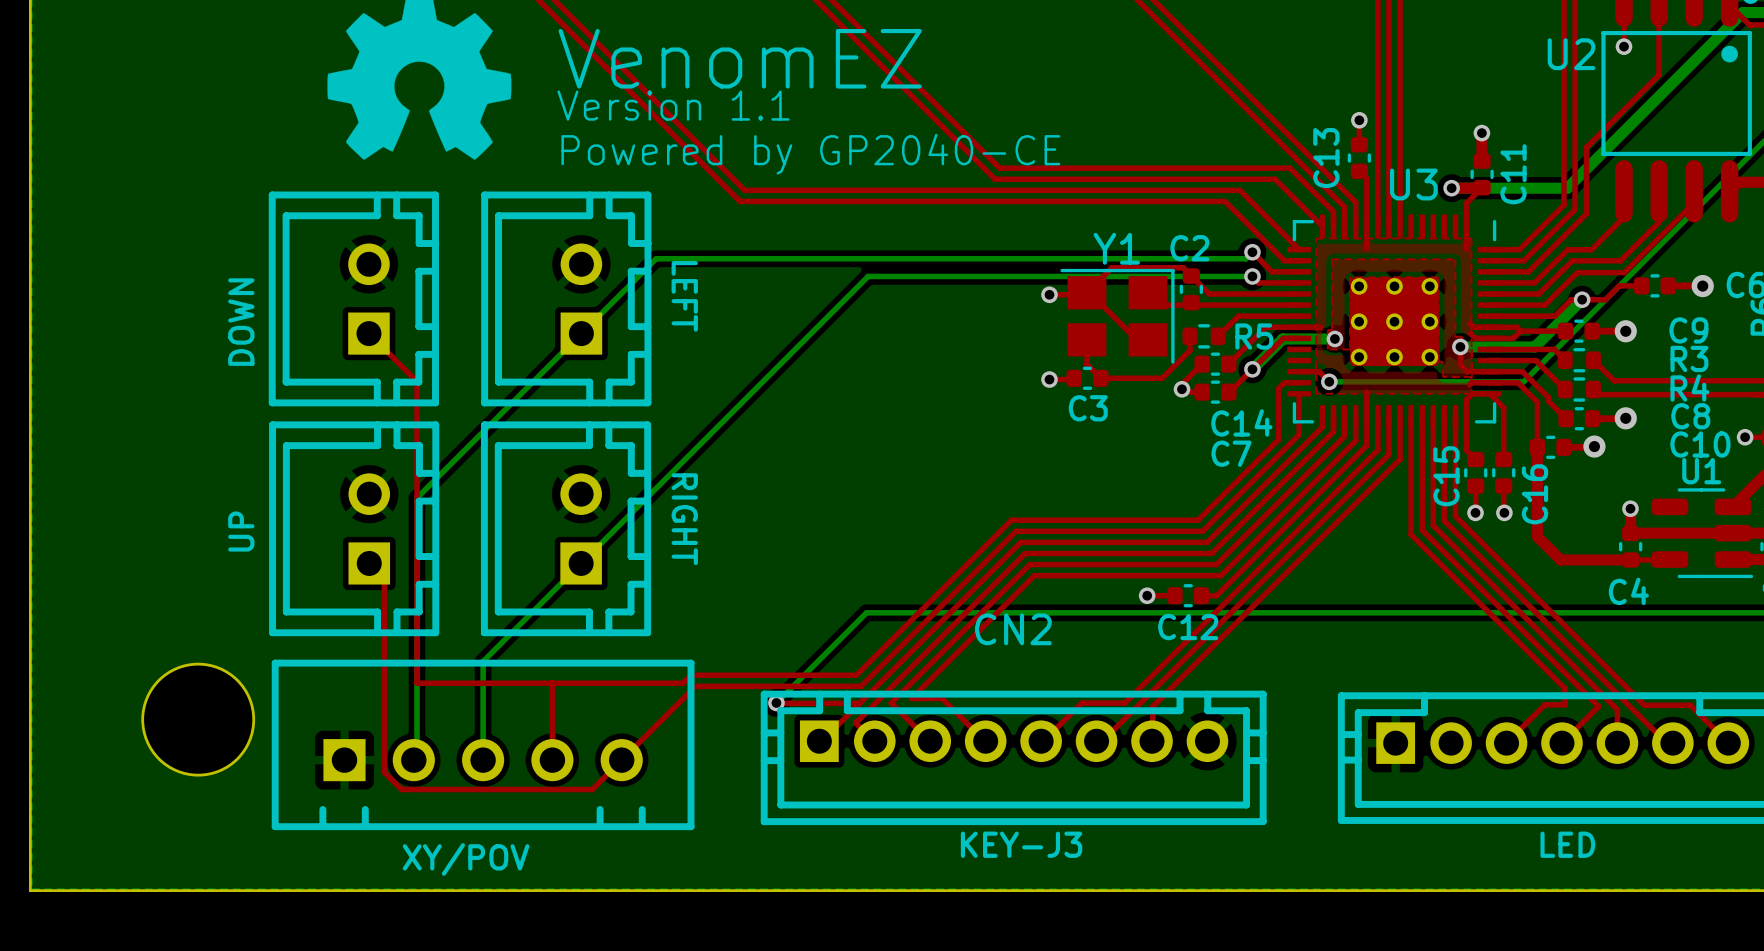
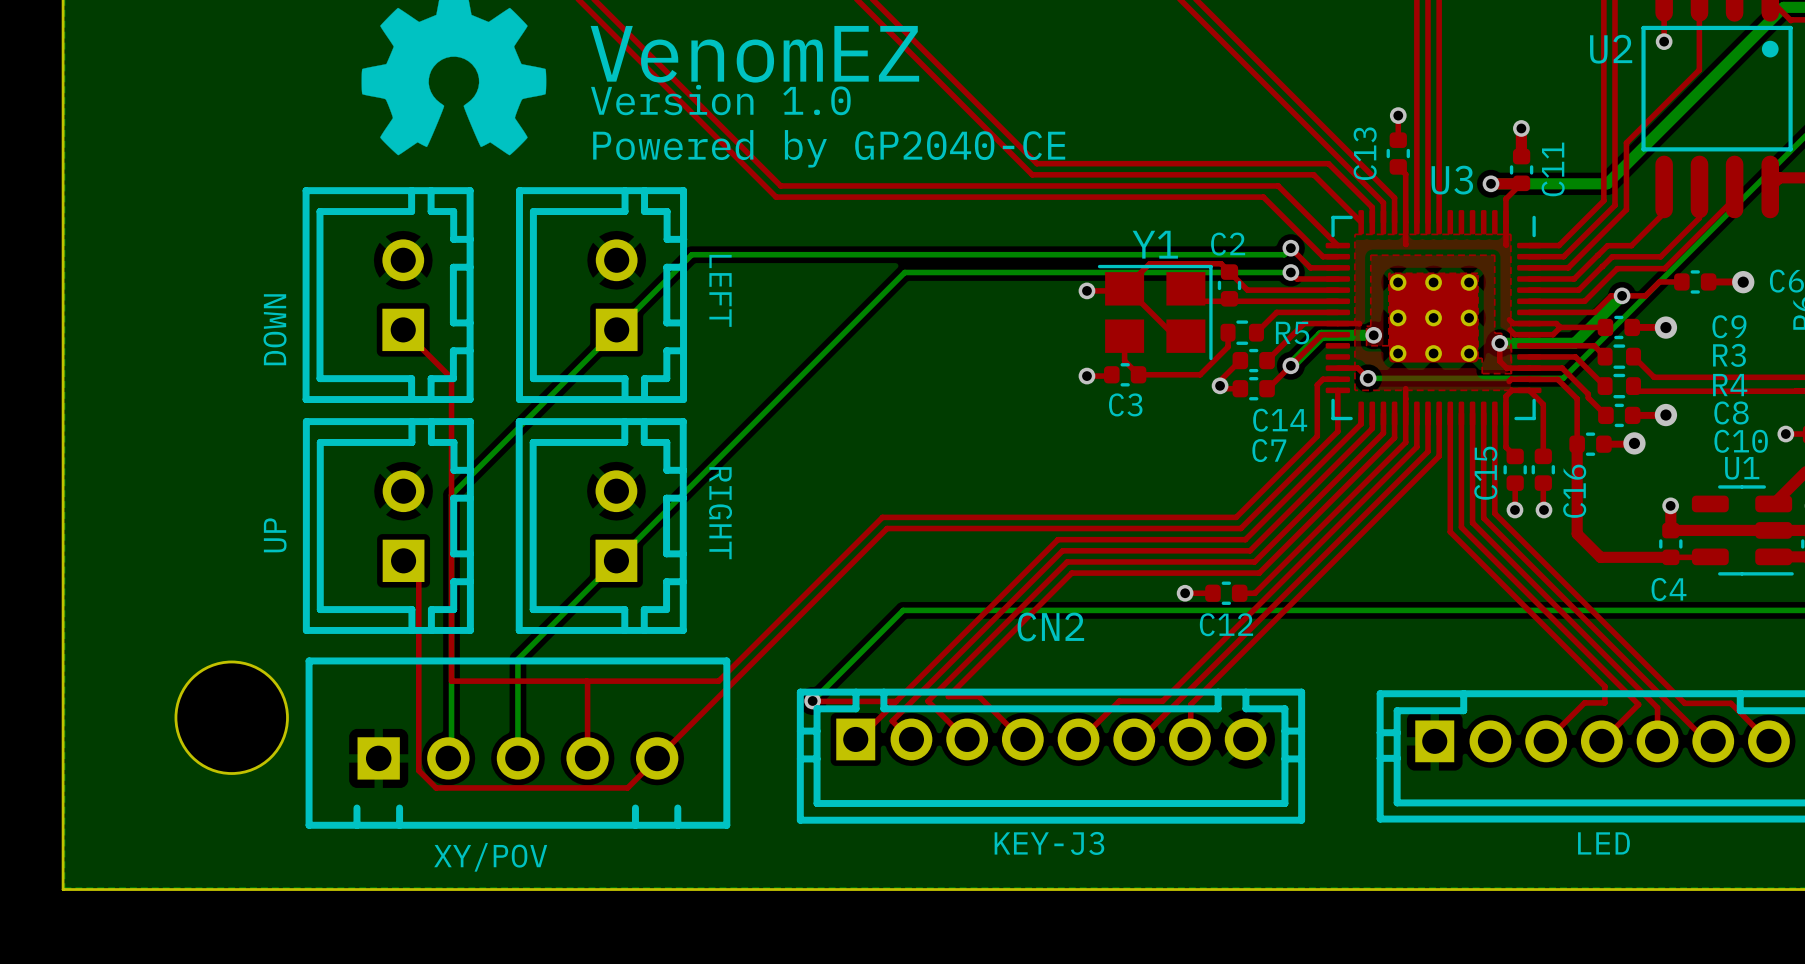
text: Version 1.1 (673, 105) -> Version 1.0 (720, 100)
top track: (1011, 520) (856, 675) (690, 675) -> (1048, 517) (882, 517) (726, 673)
top track: (1016, 531) (861, 686) (695, 686) -> (1053, 528) (887, 528) (731, 684)

